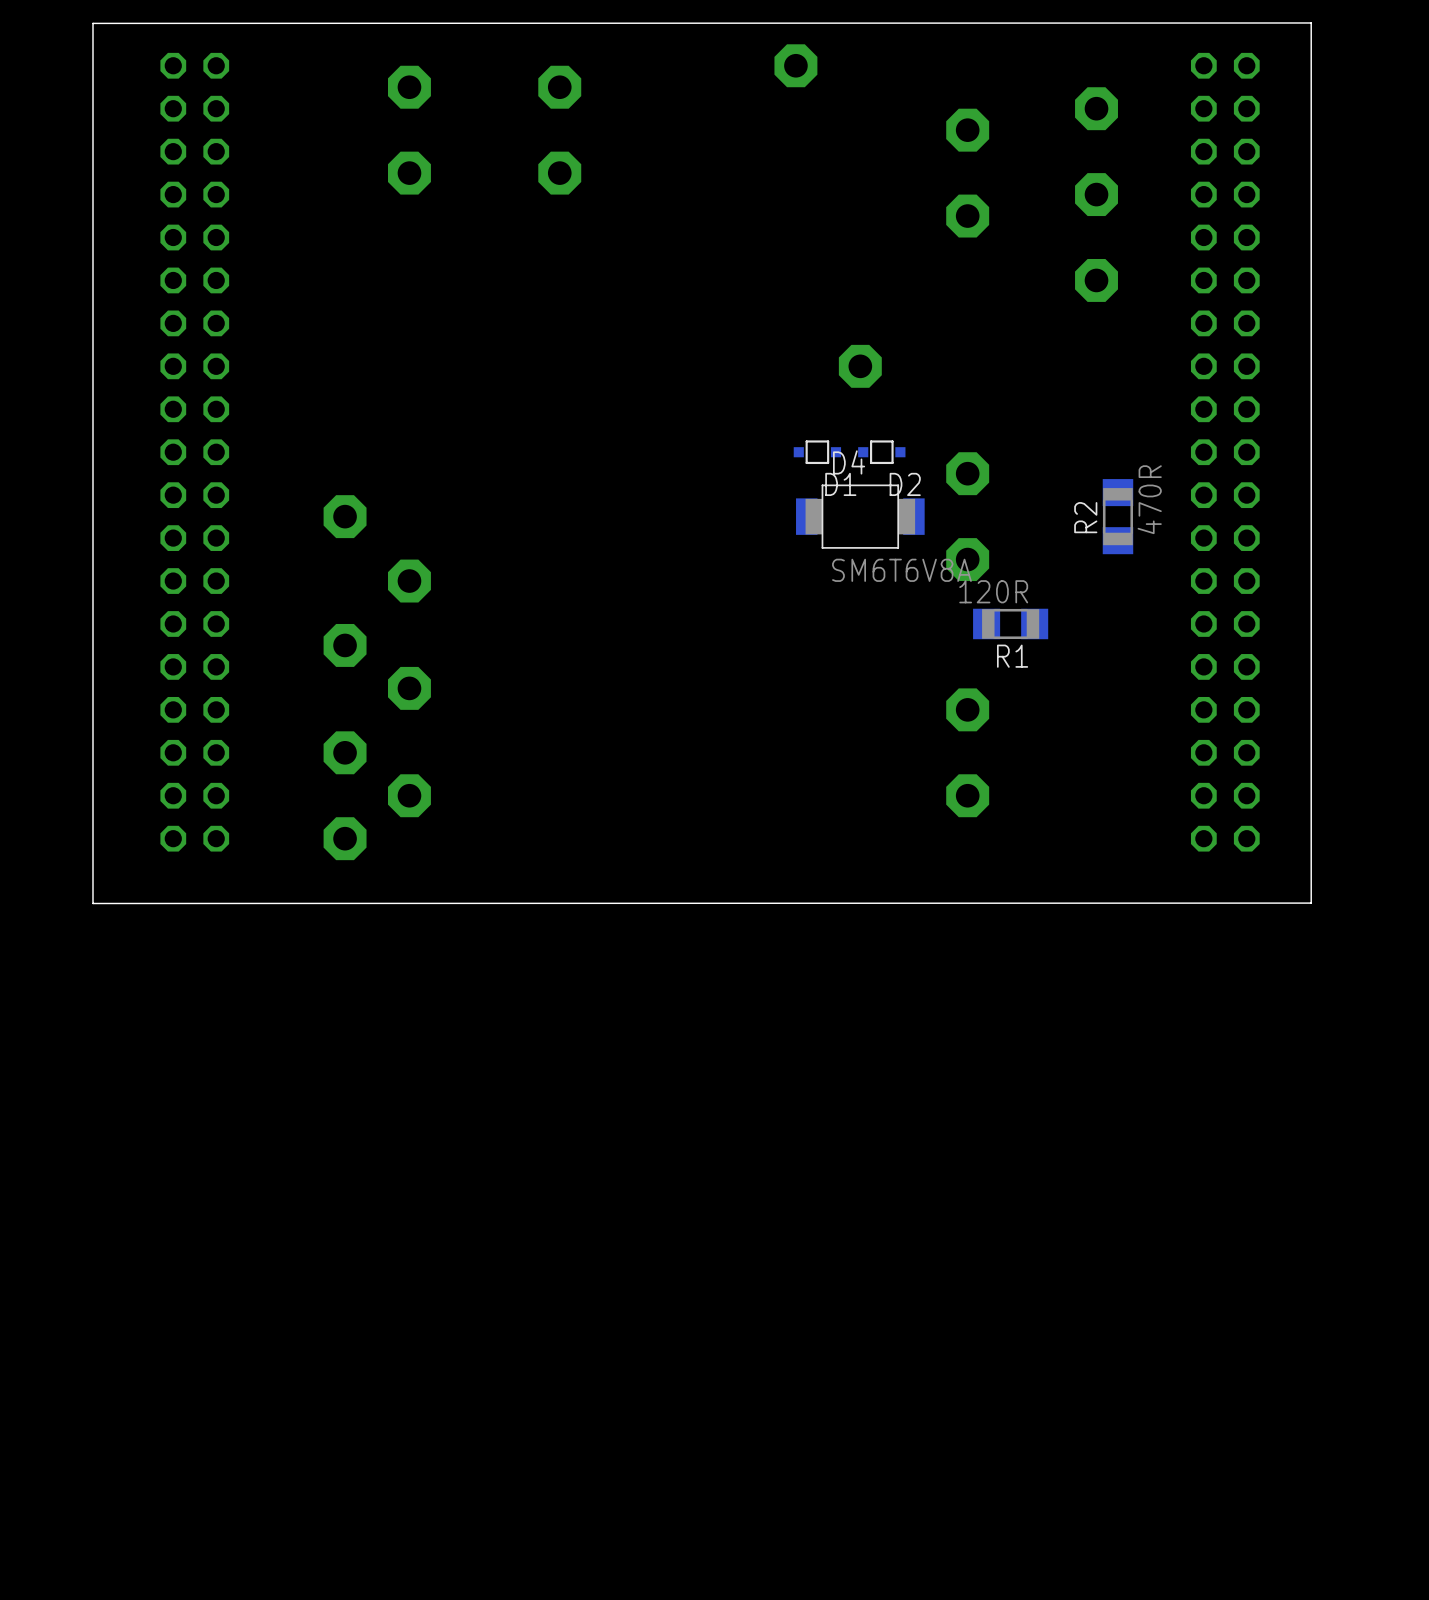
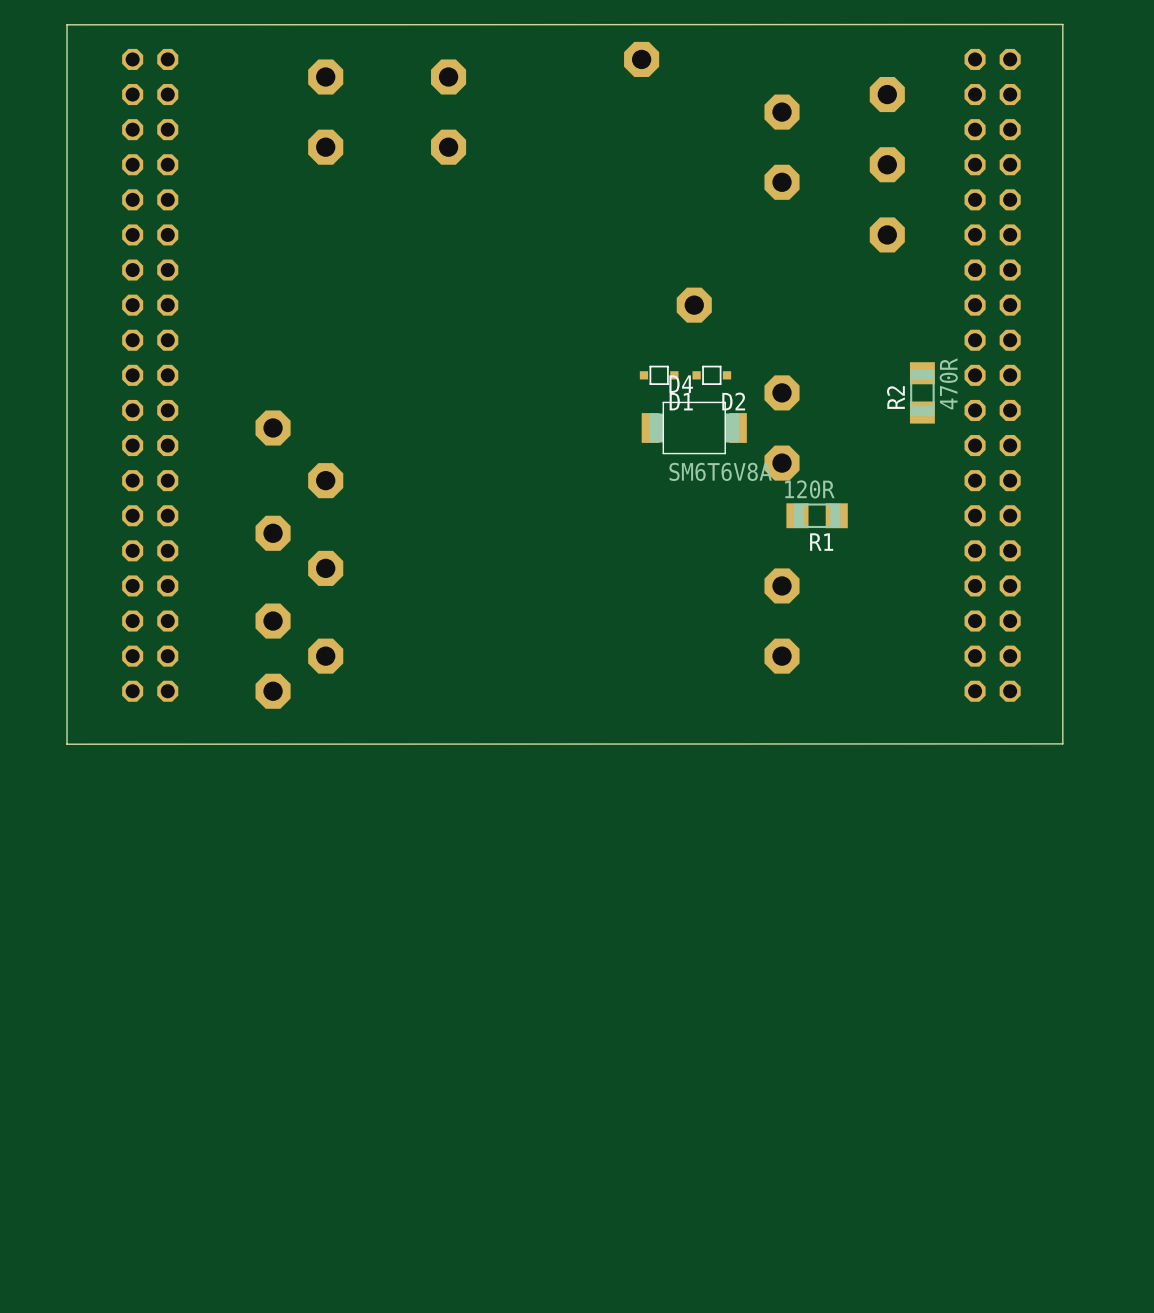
R2 position: (1117, 516) -> (922, 392)

